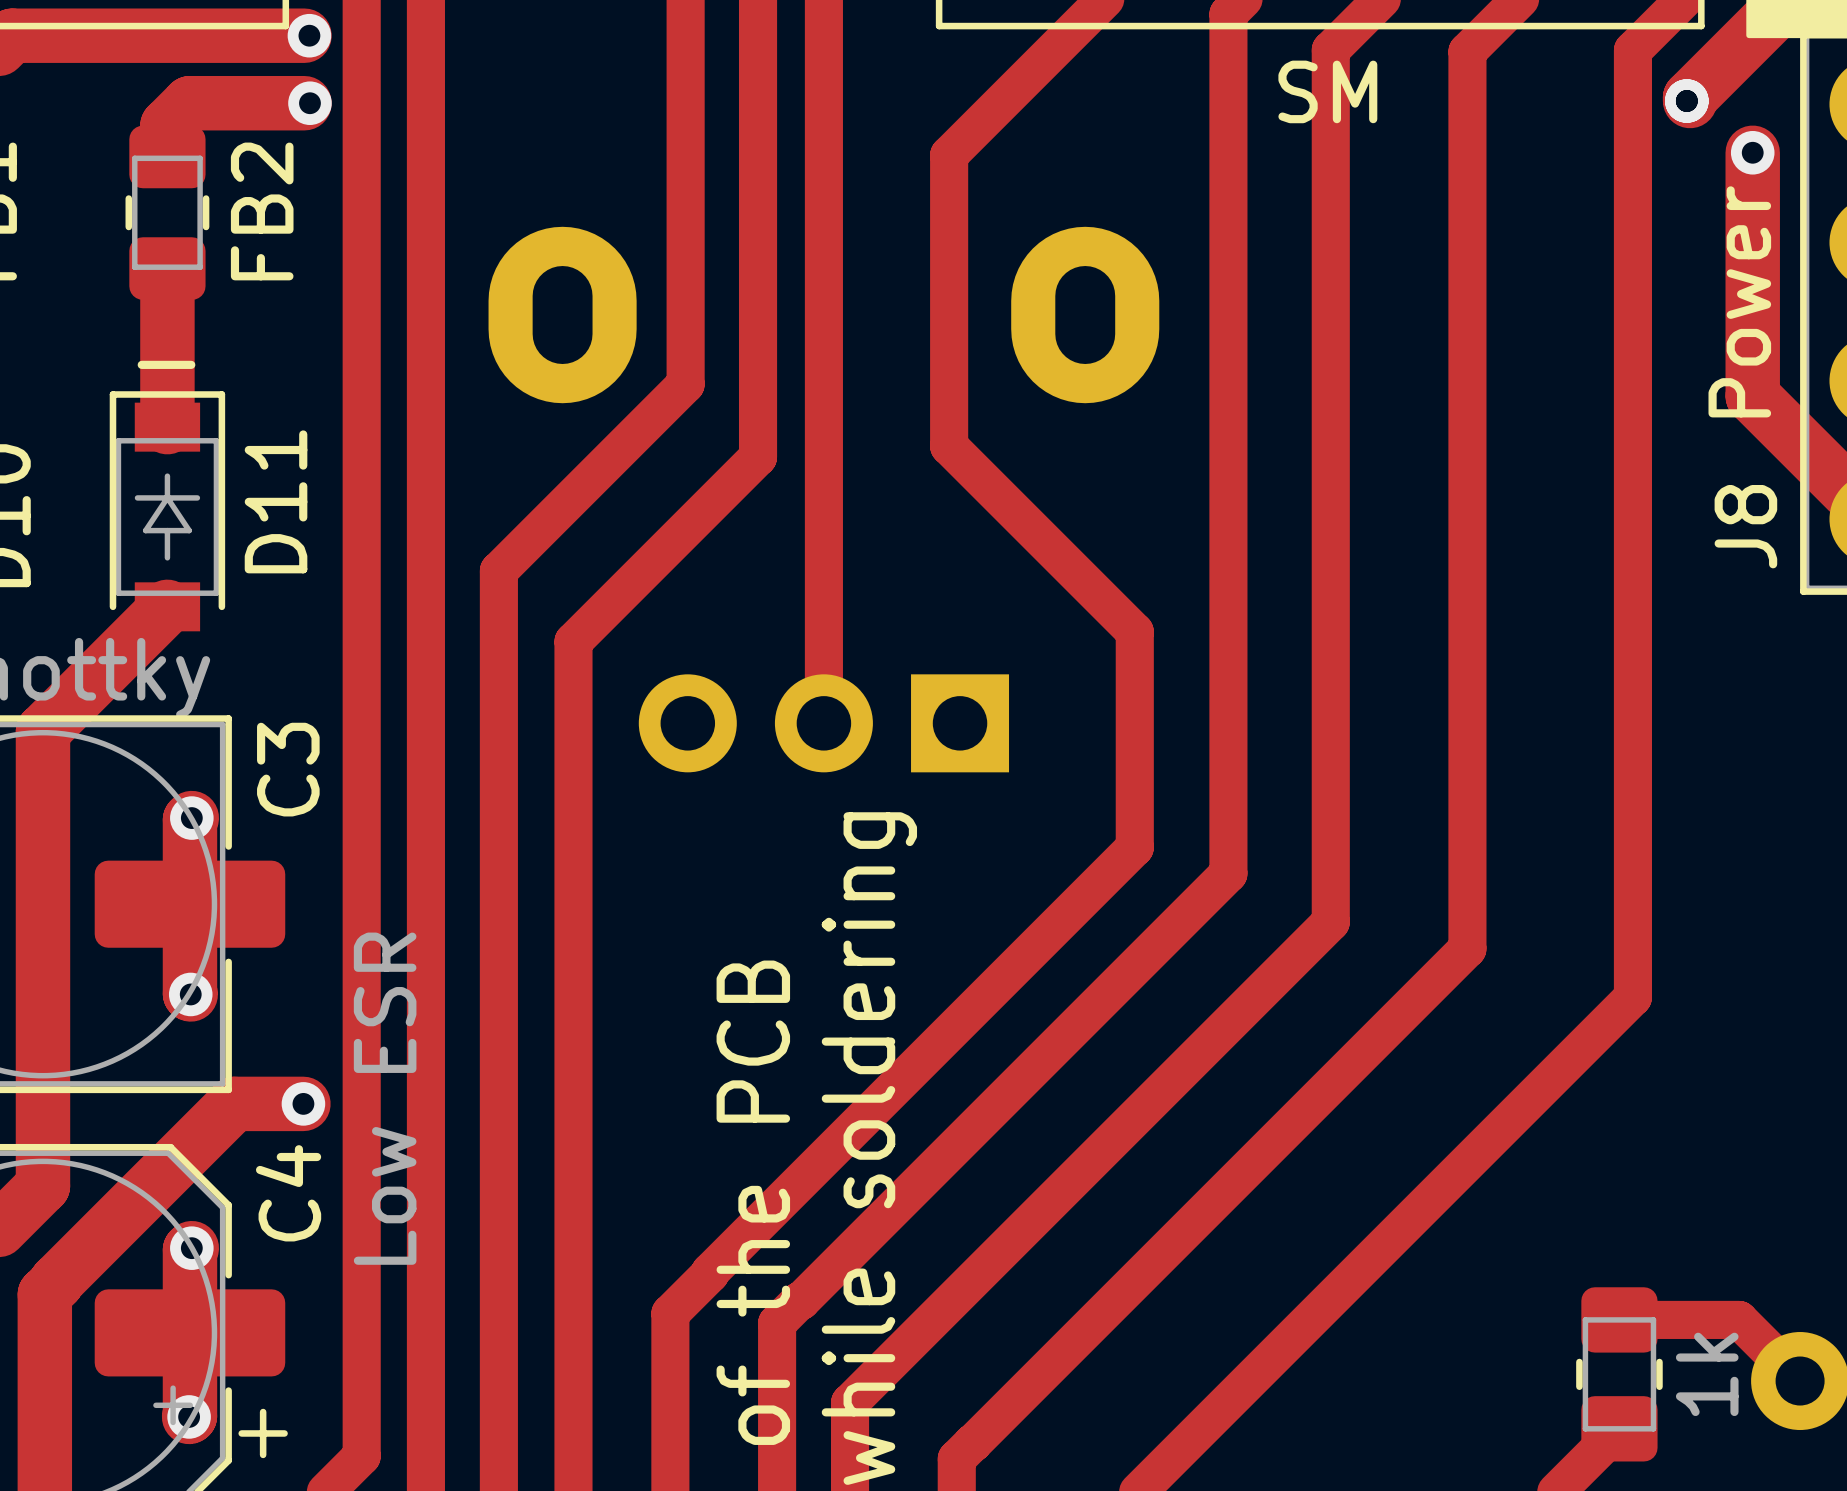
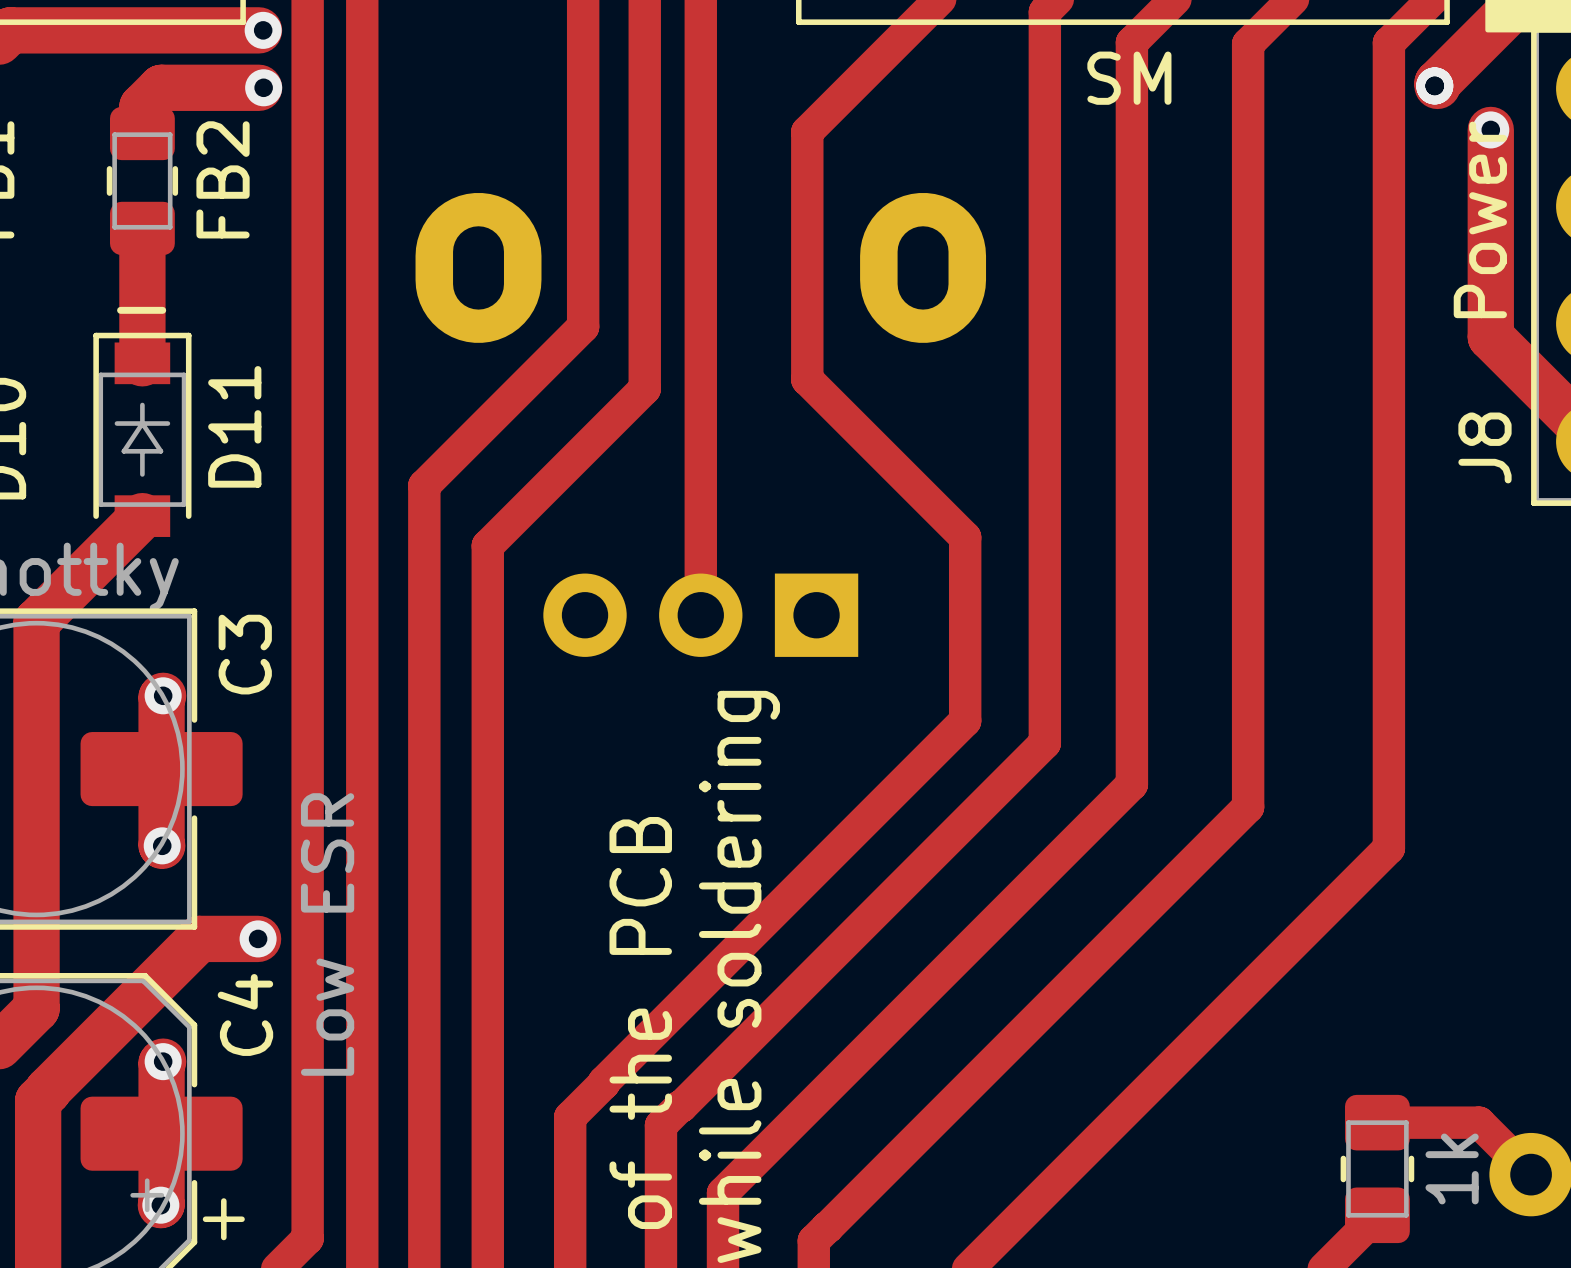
J8 value position: Power (1739, 301) -> Power (1480, 219)

